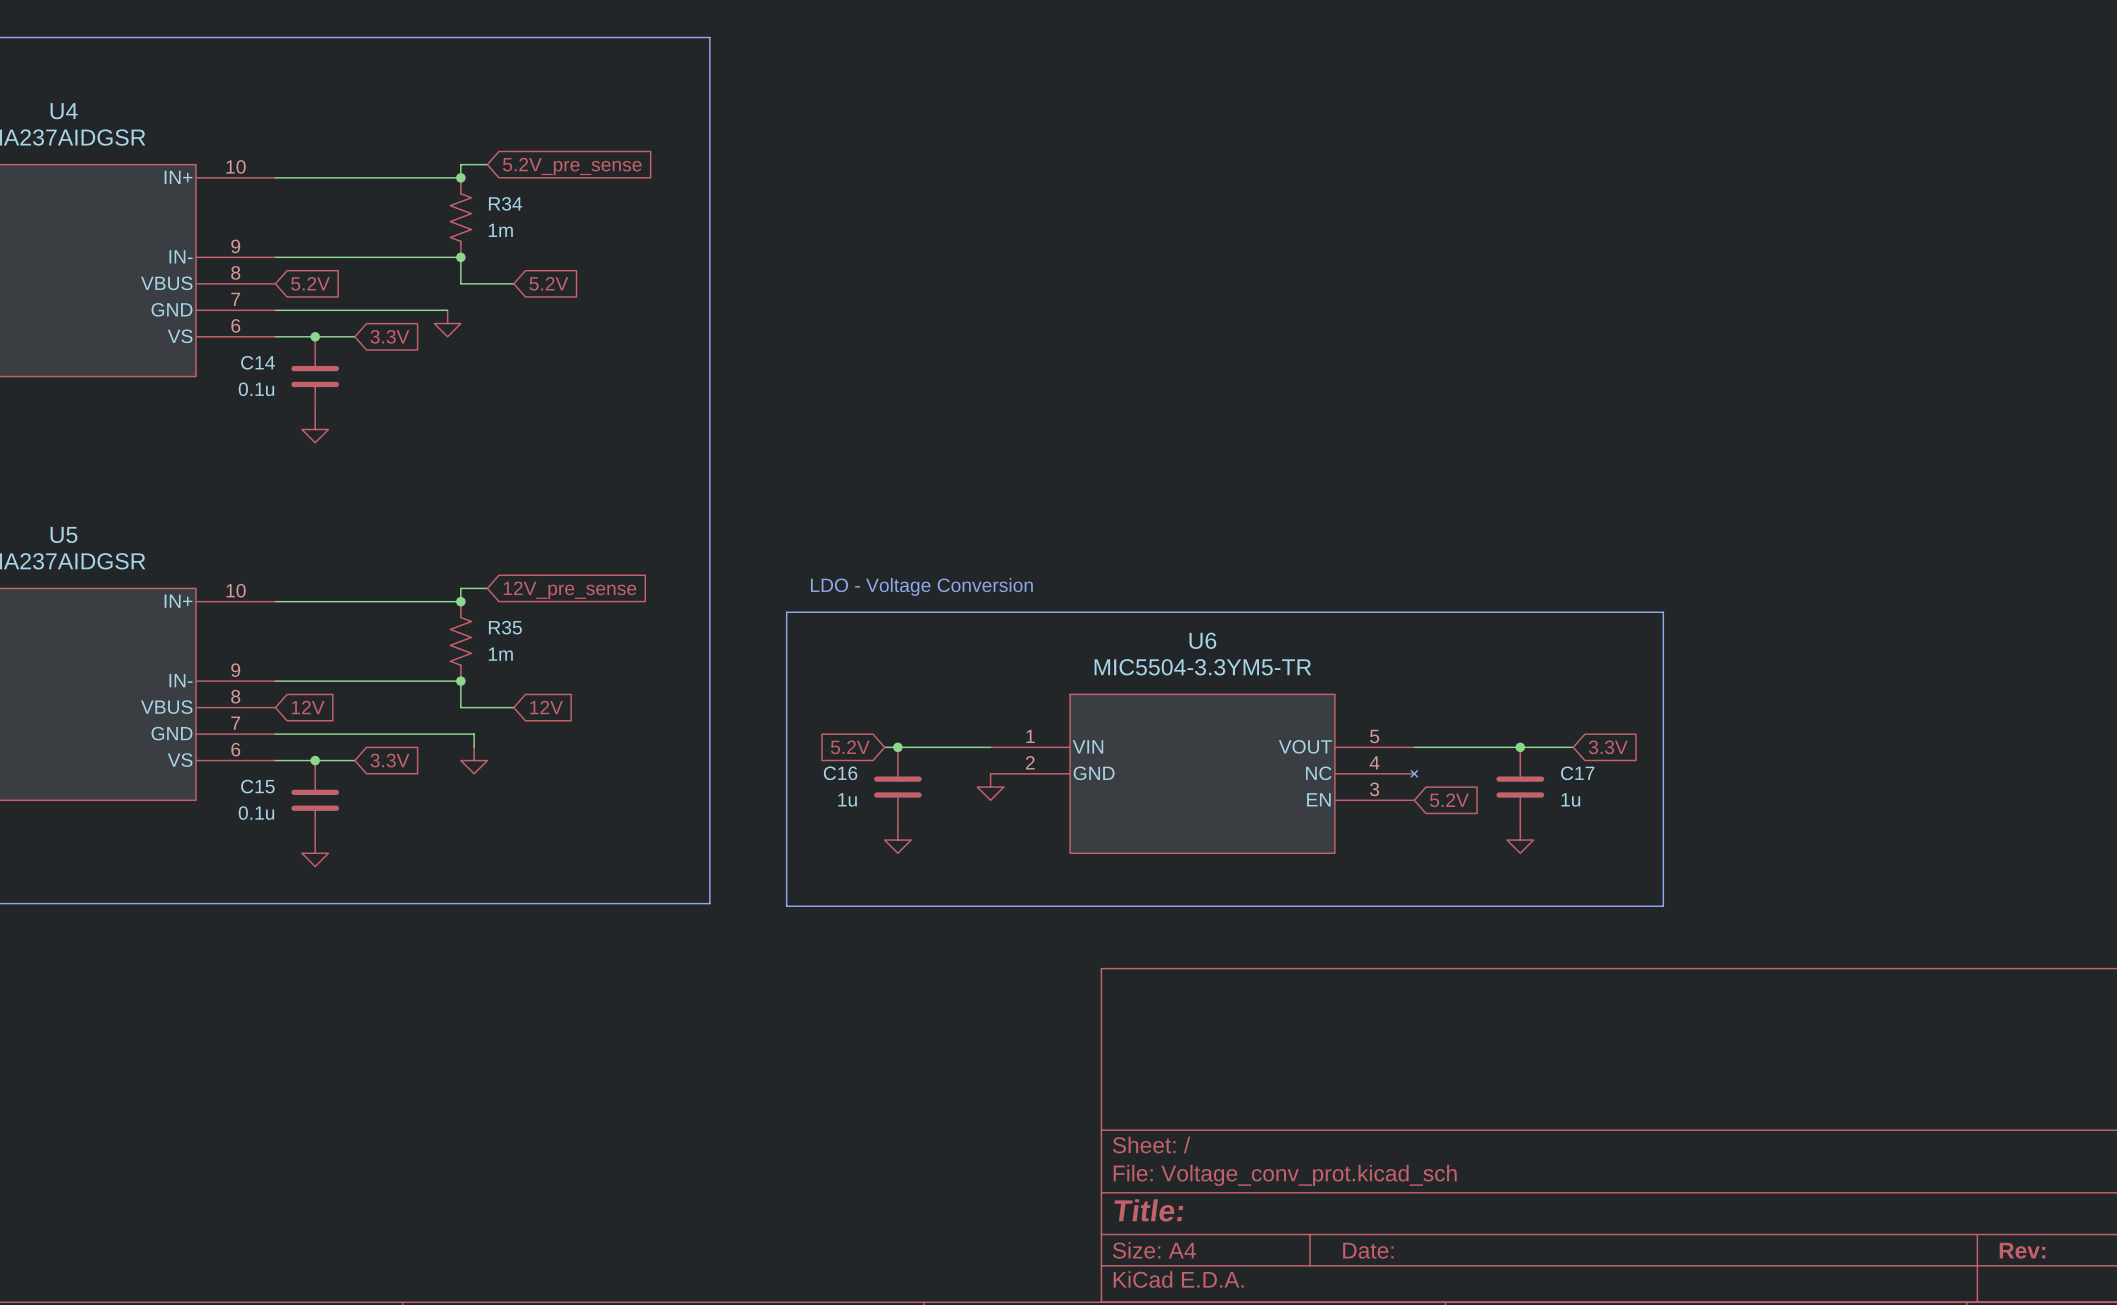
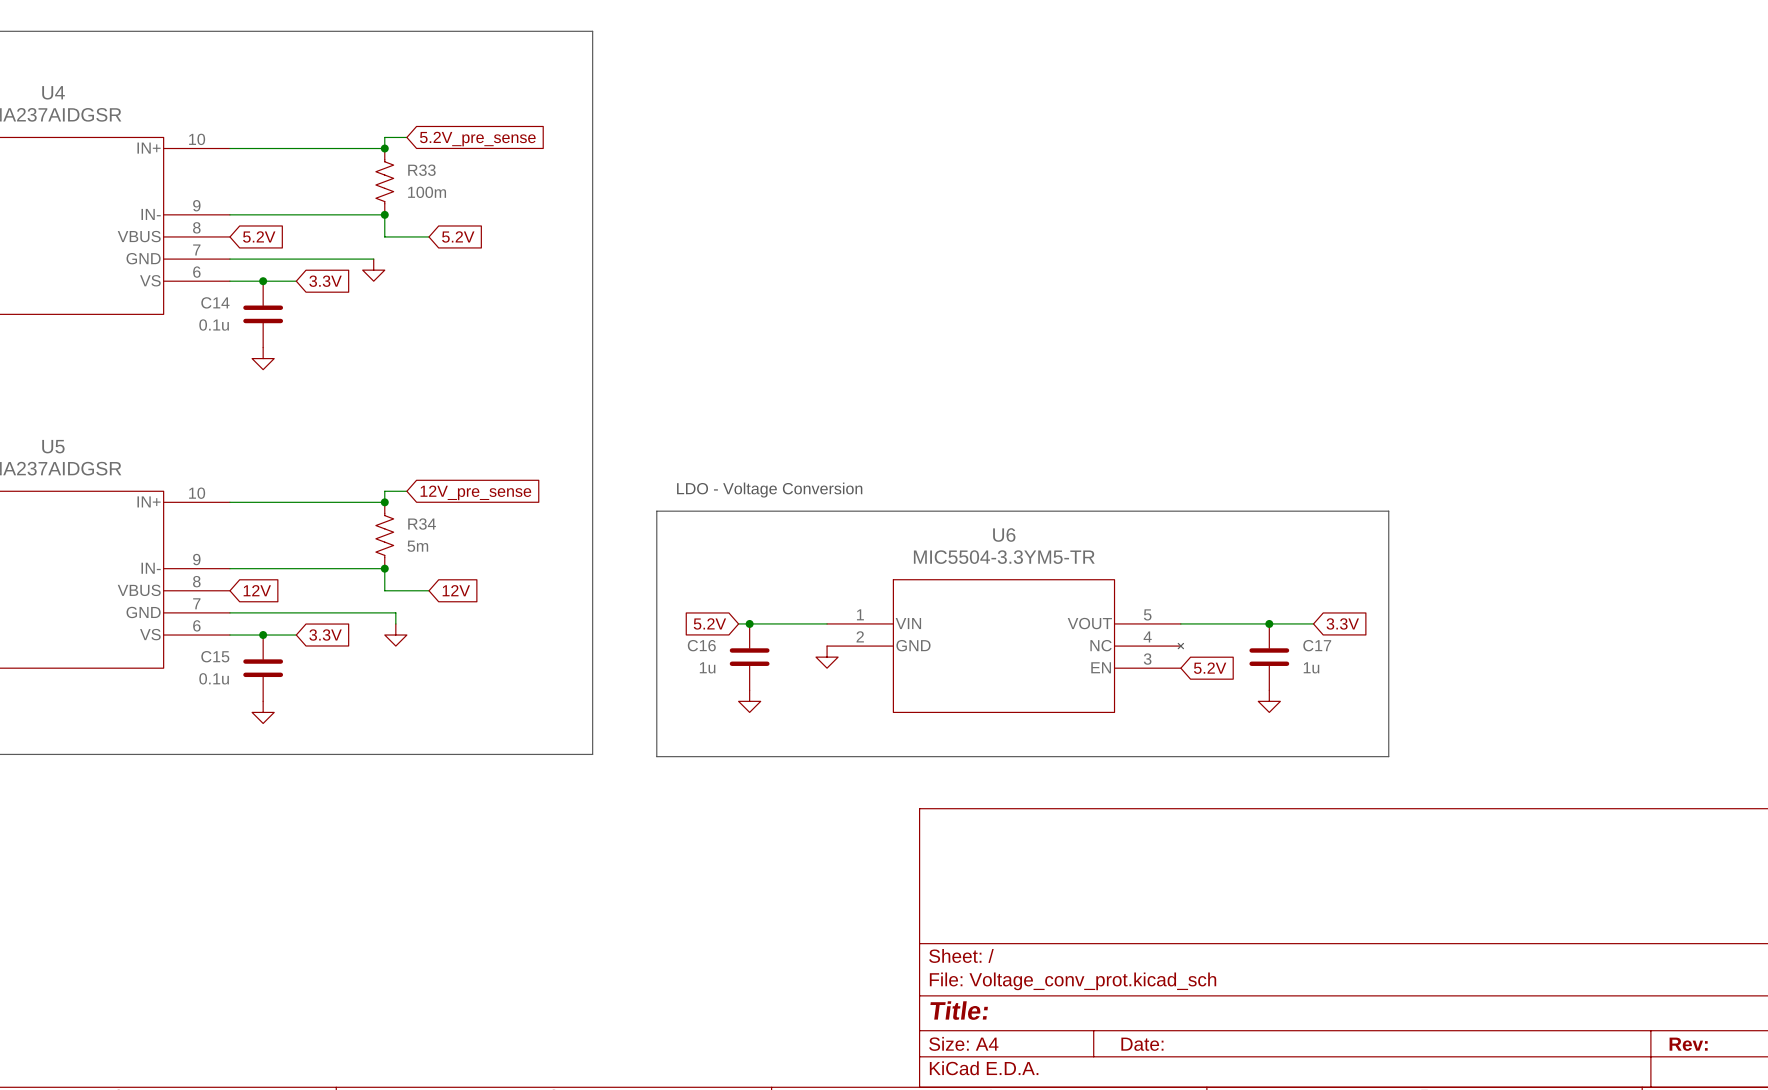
R34 name: R34 (505, 203) -> R33 (421, 170)
R34 value: 1m (500, 230) -> 100m (427, 192)
R35 name: R35 (505, 627) -> R34 (422, 524)
R35 value: 1m (500, 654) -> 5m (417, 546)

